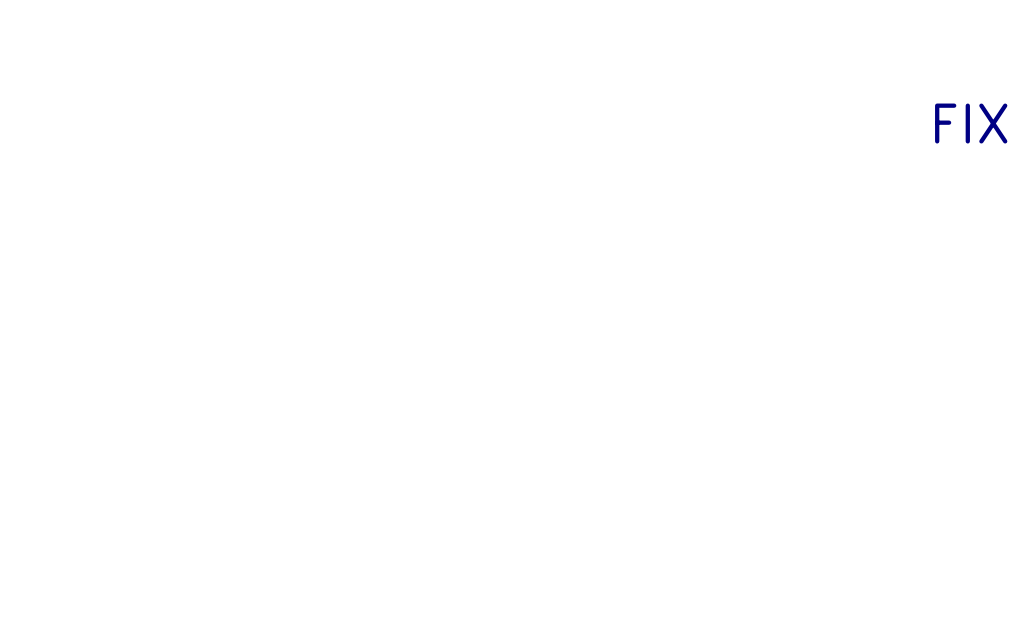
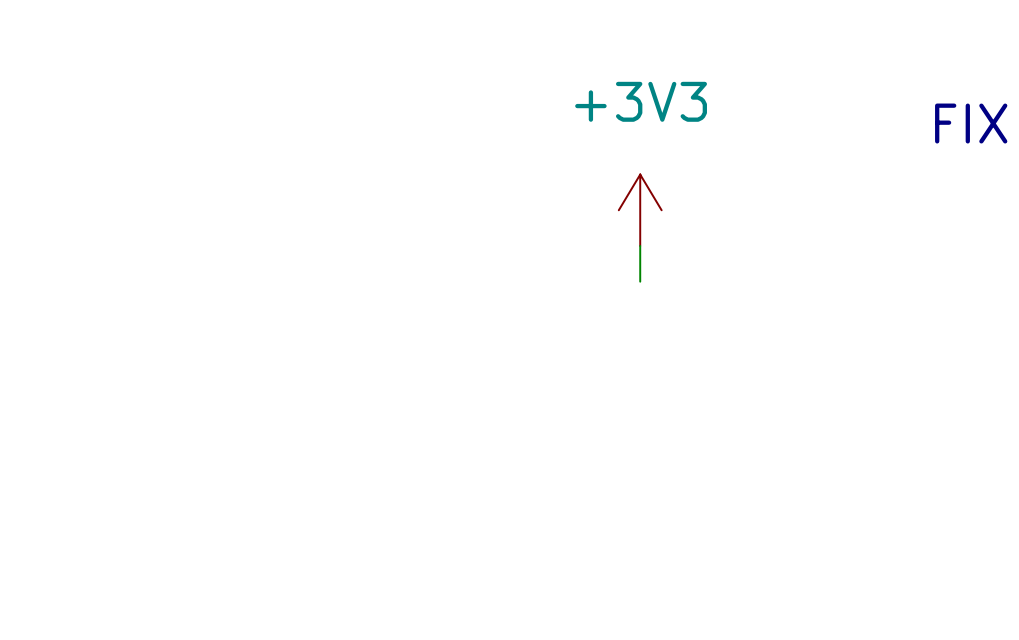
power symbol: none -> +3V3 (640, 210)
wire: none -> (640, 245) (640, 281)

